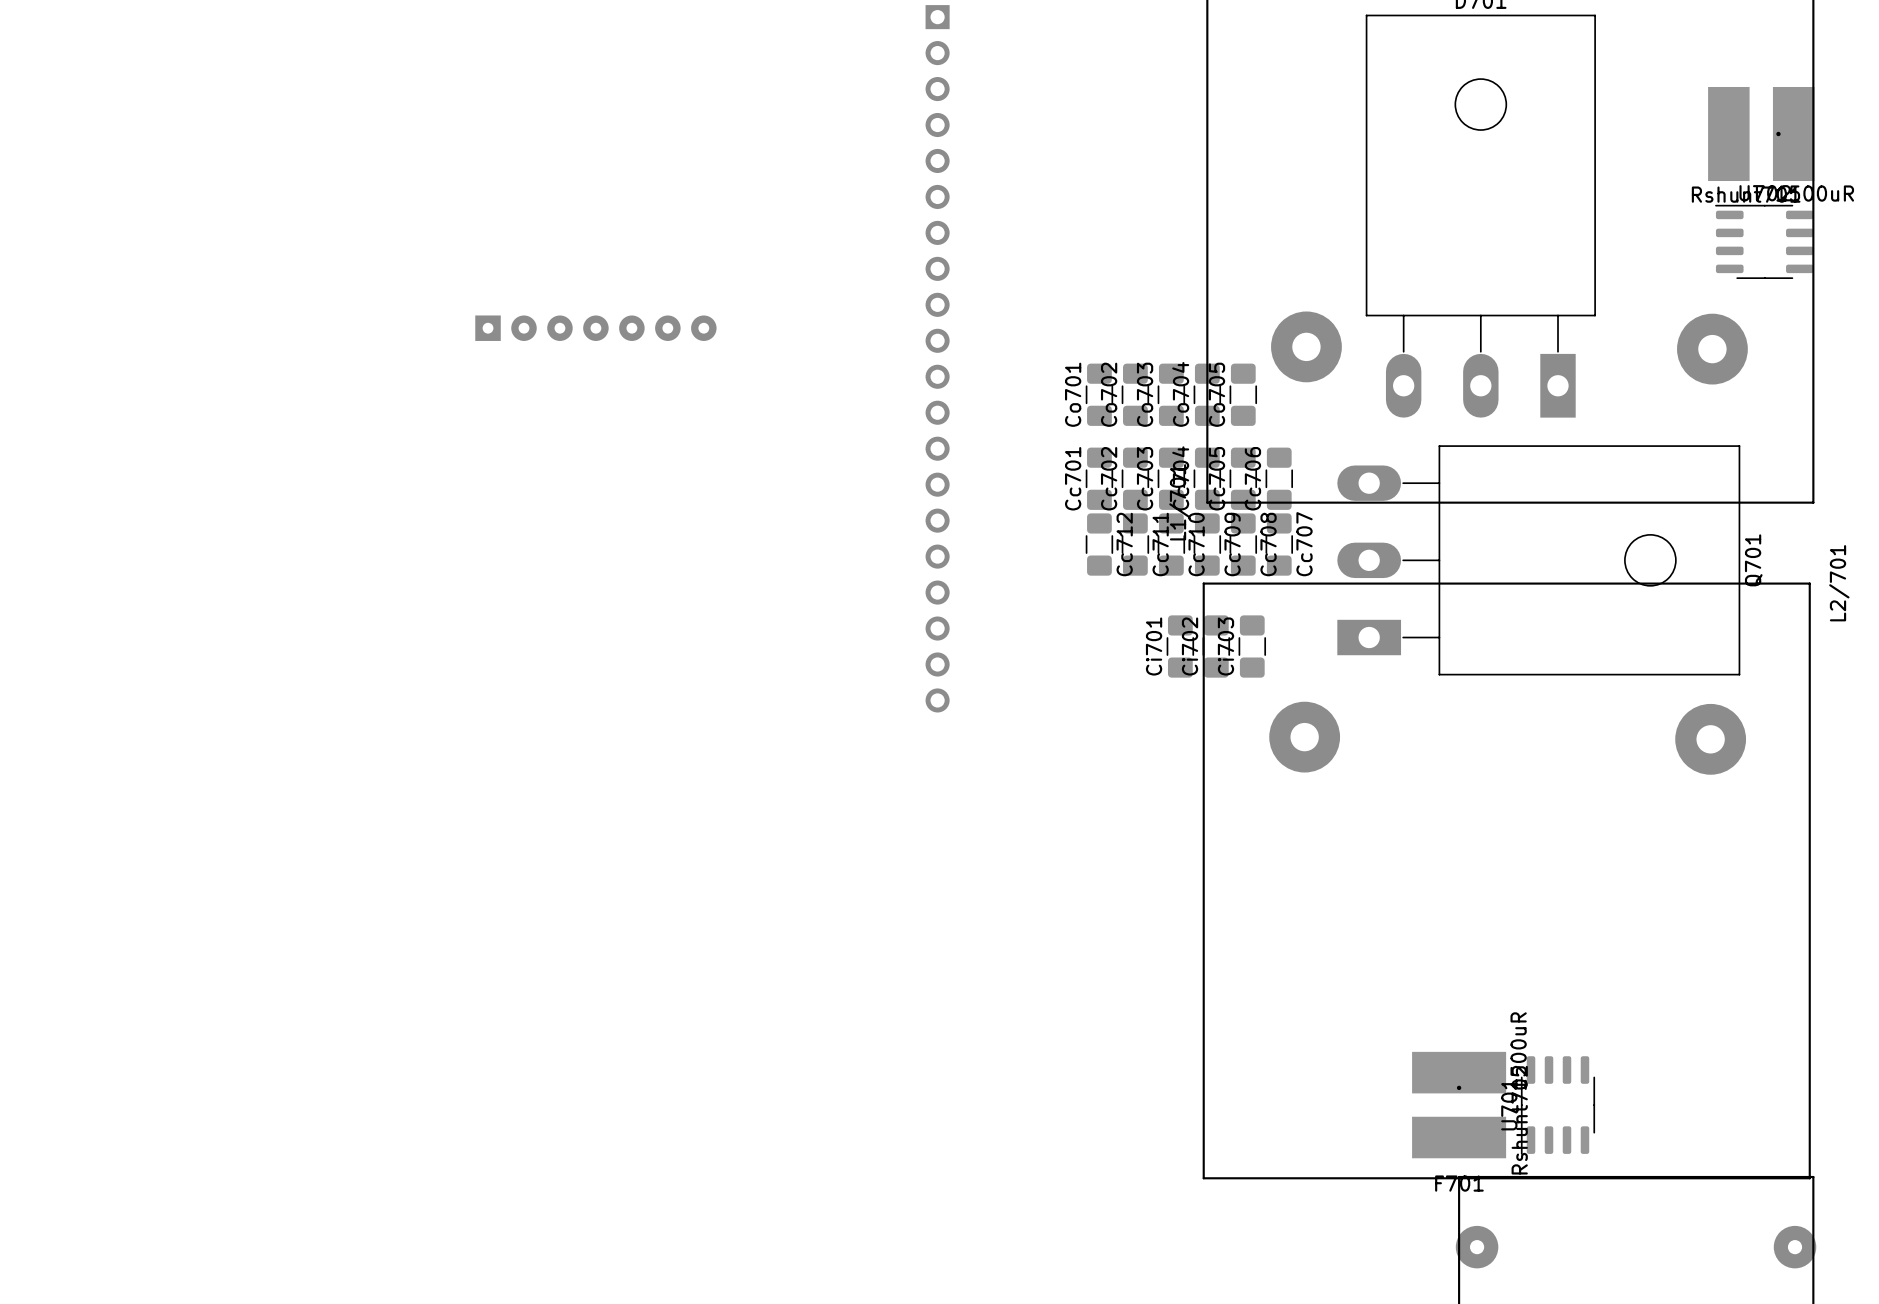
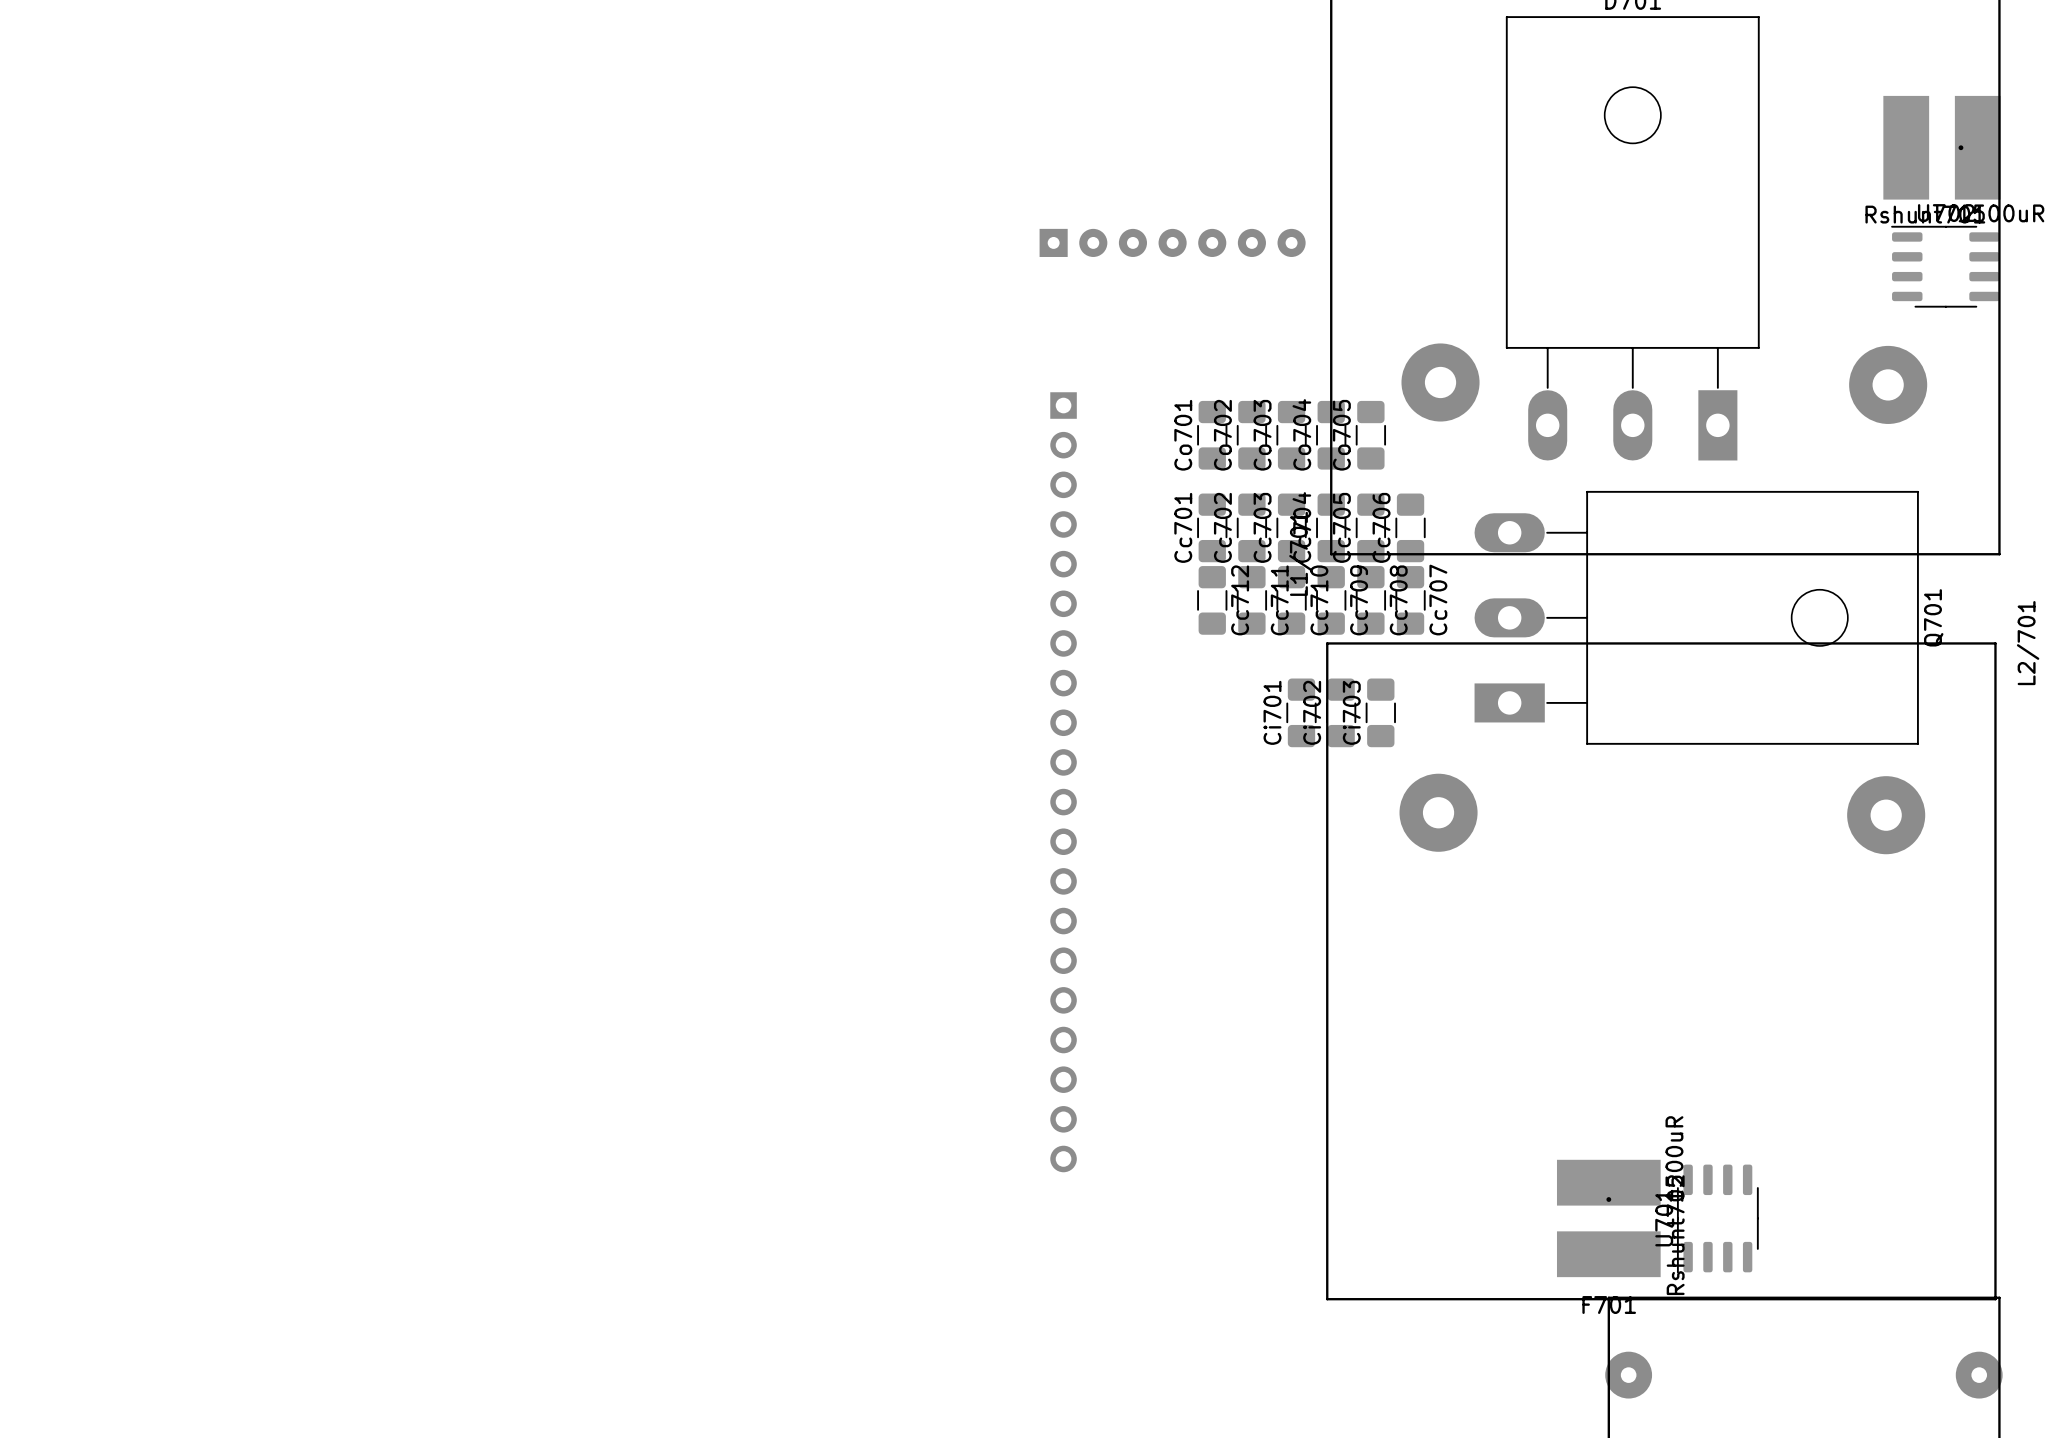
part: none -> (1172, 242)
part: (595, 328) -> none
part position: (937, 358) -> (1063, 782)

